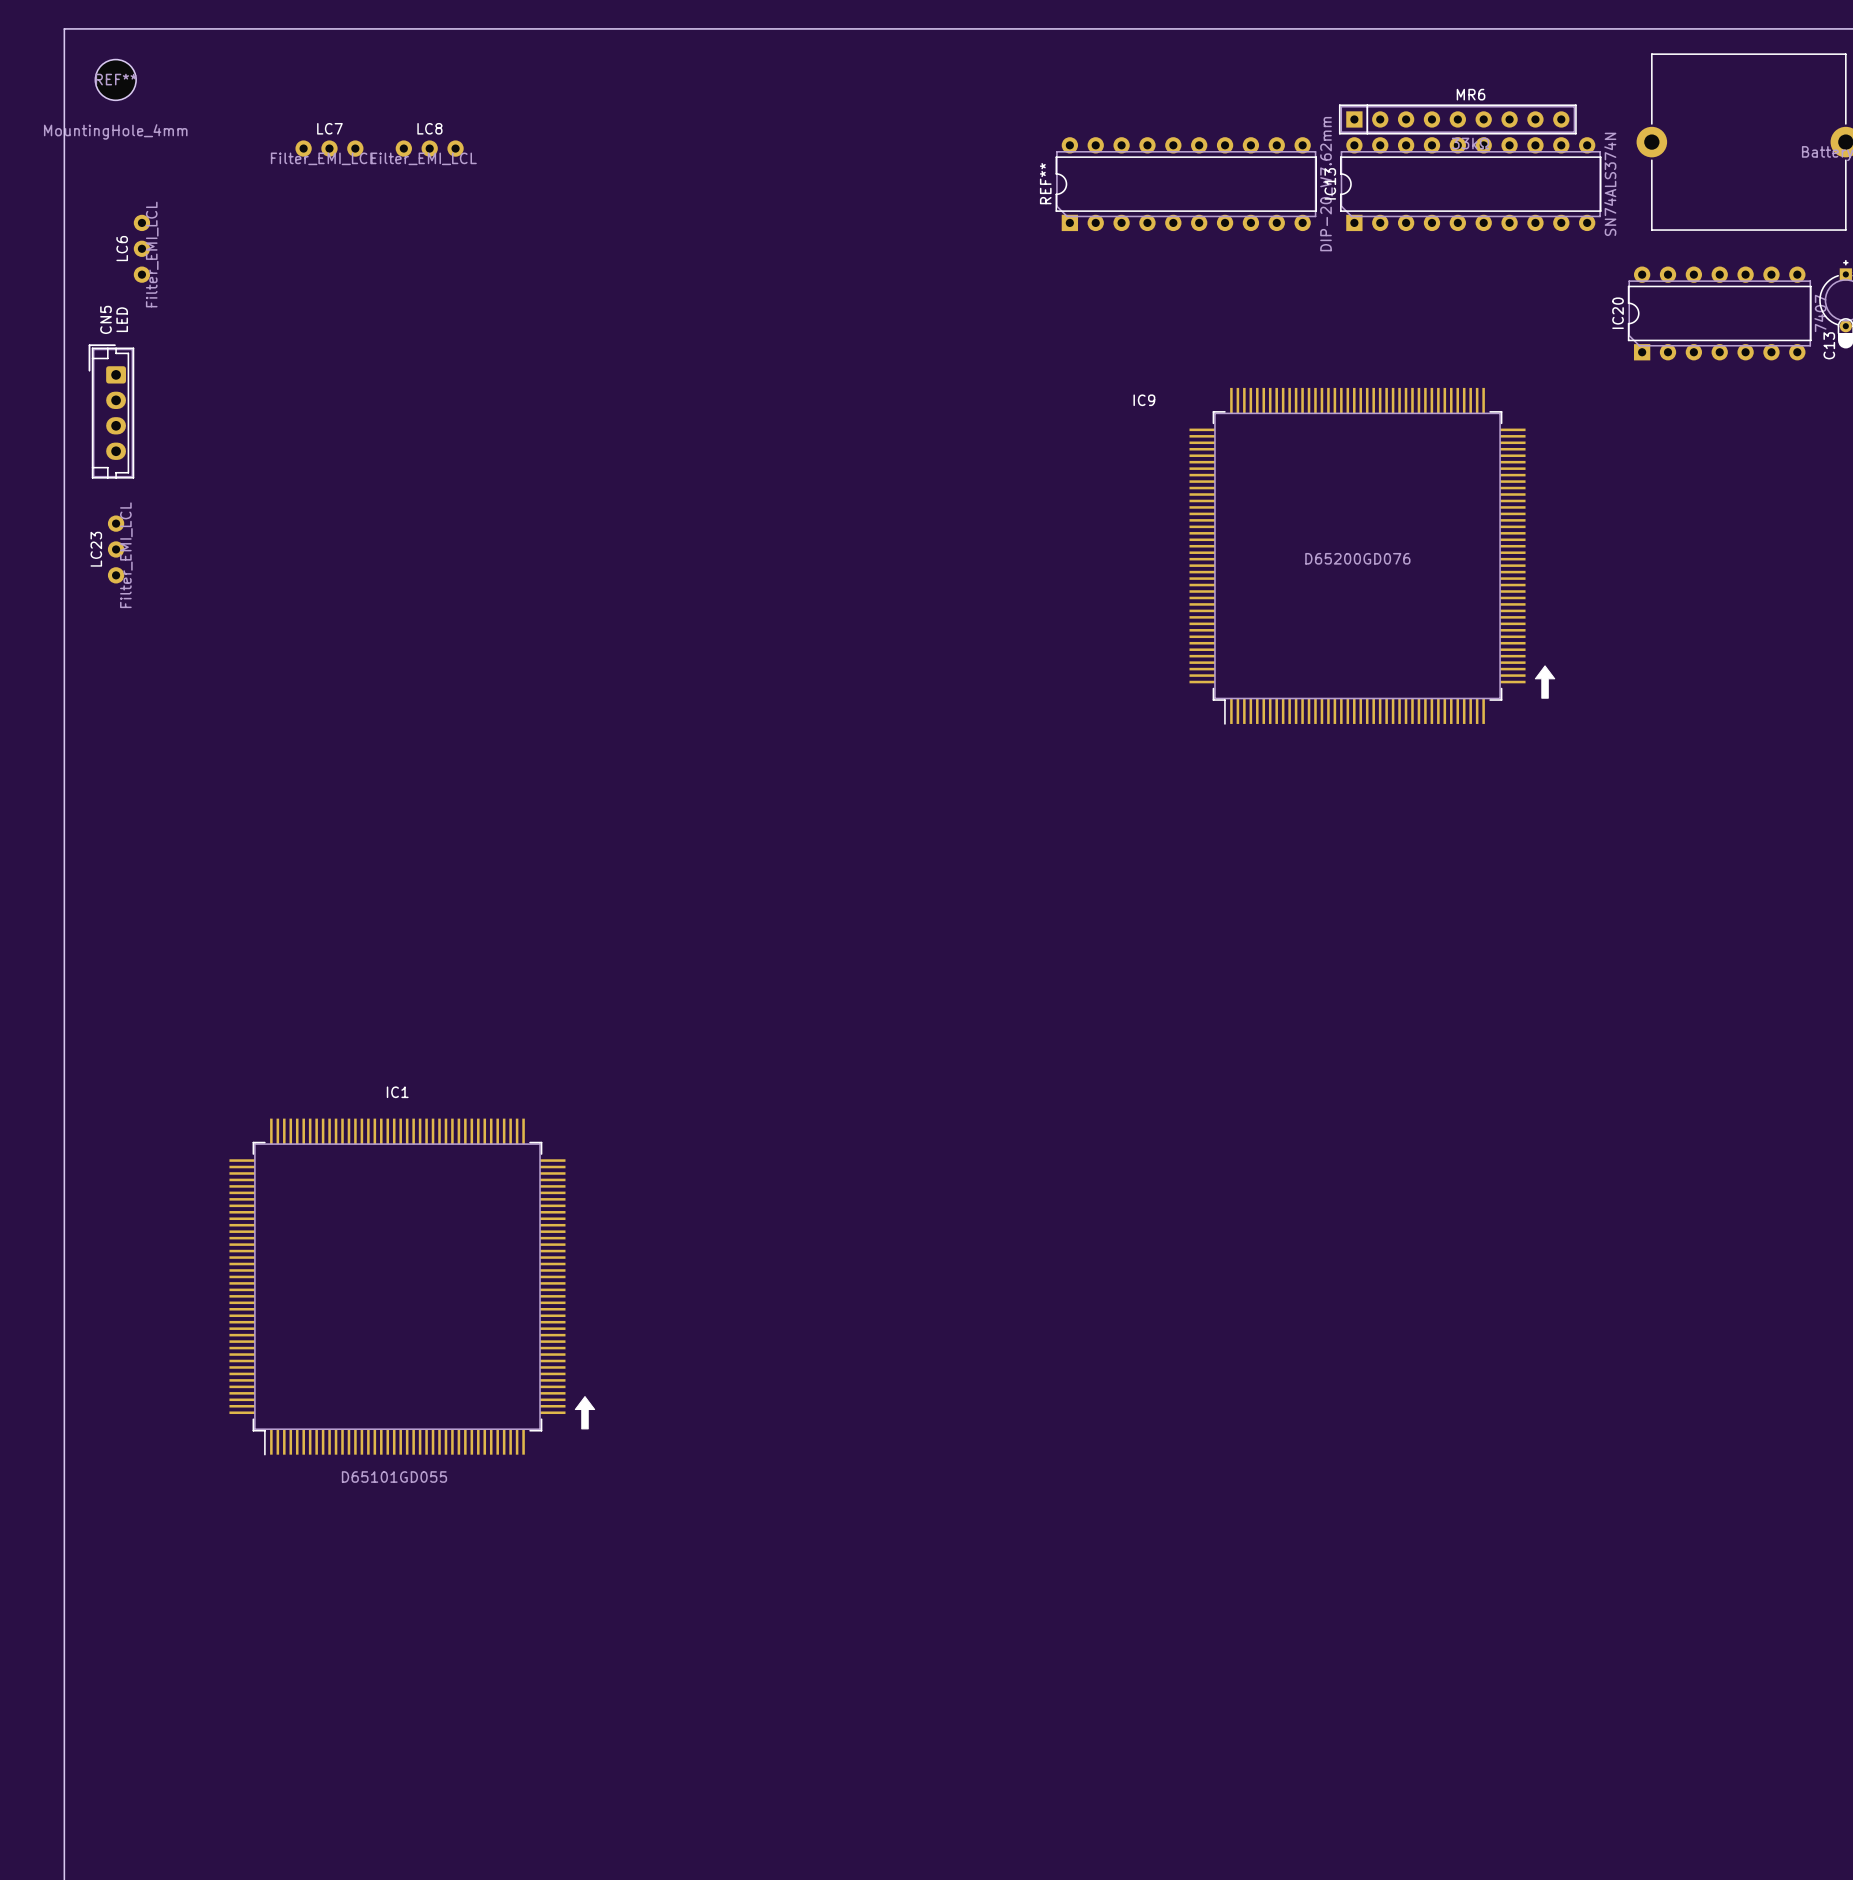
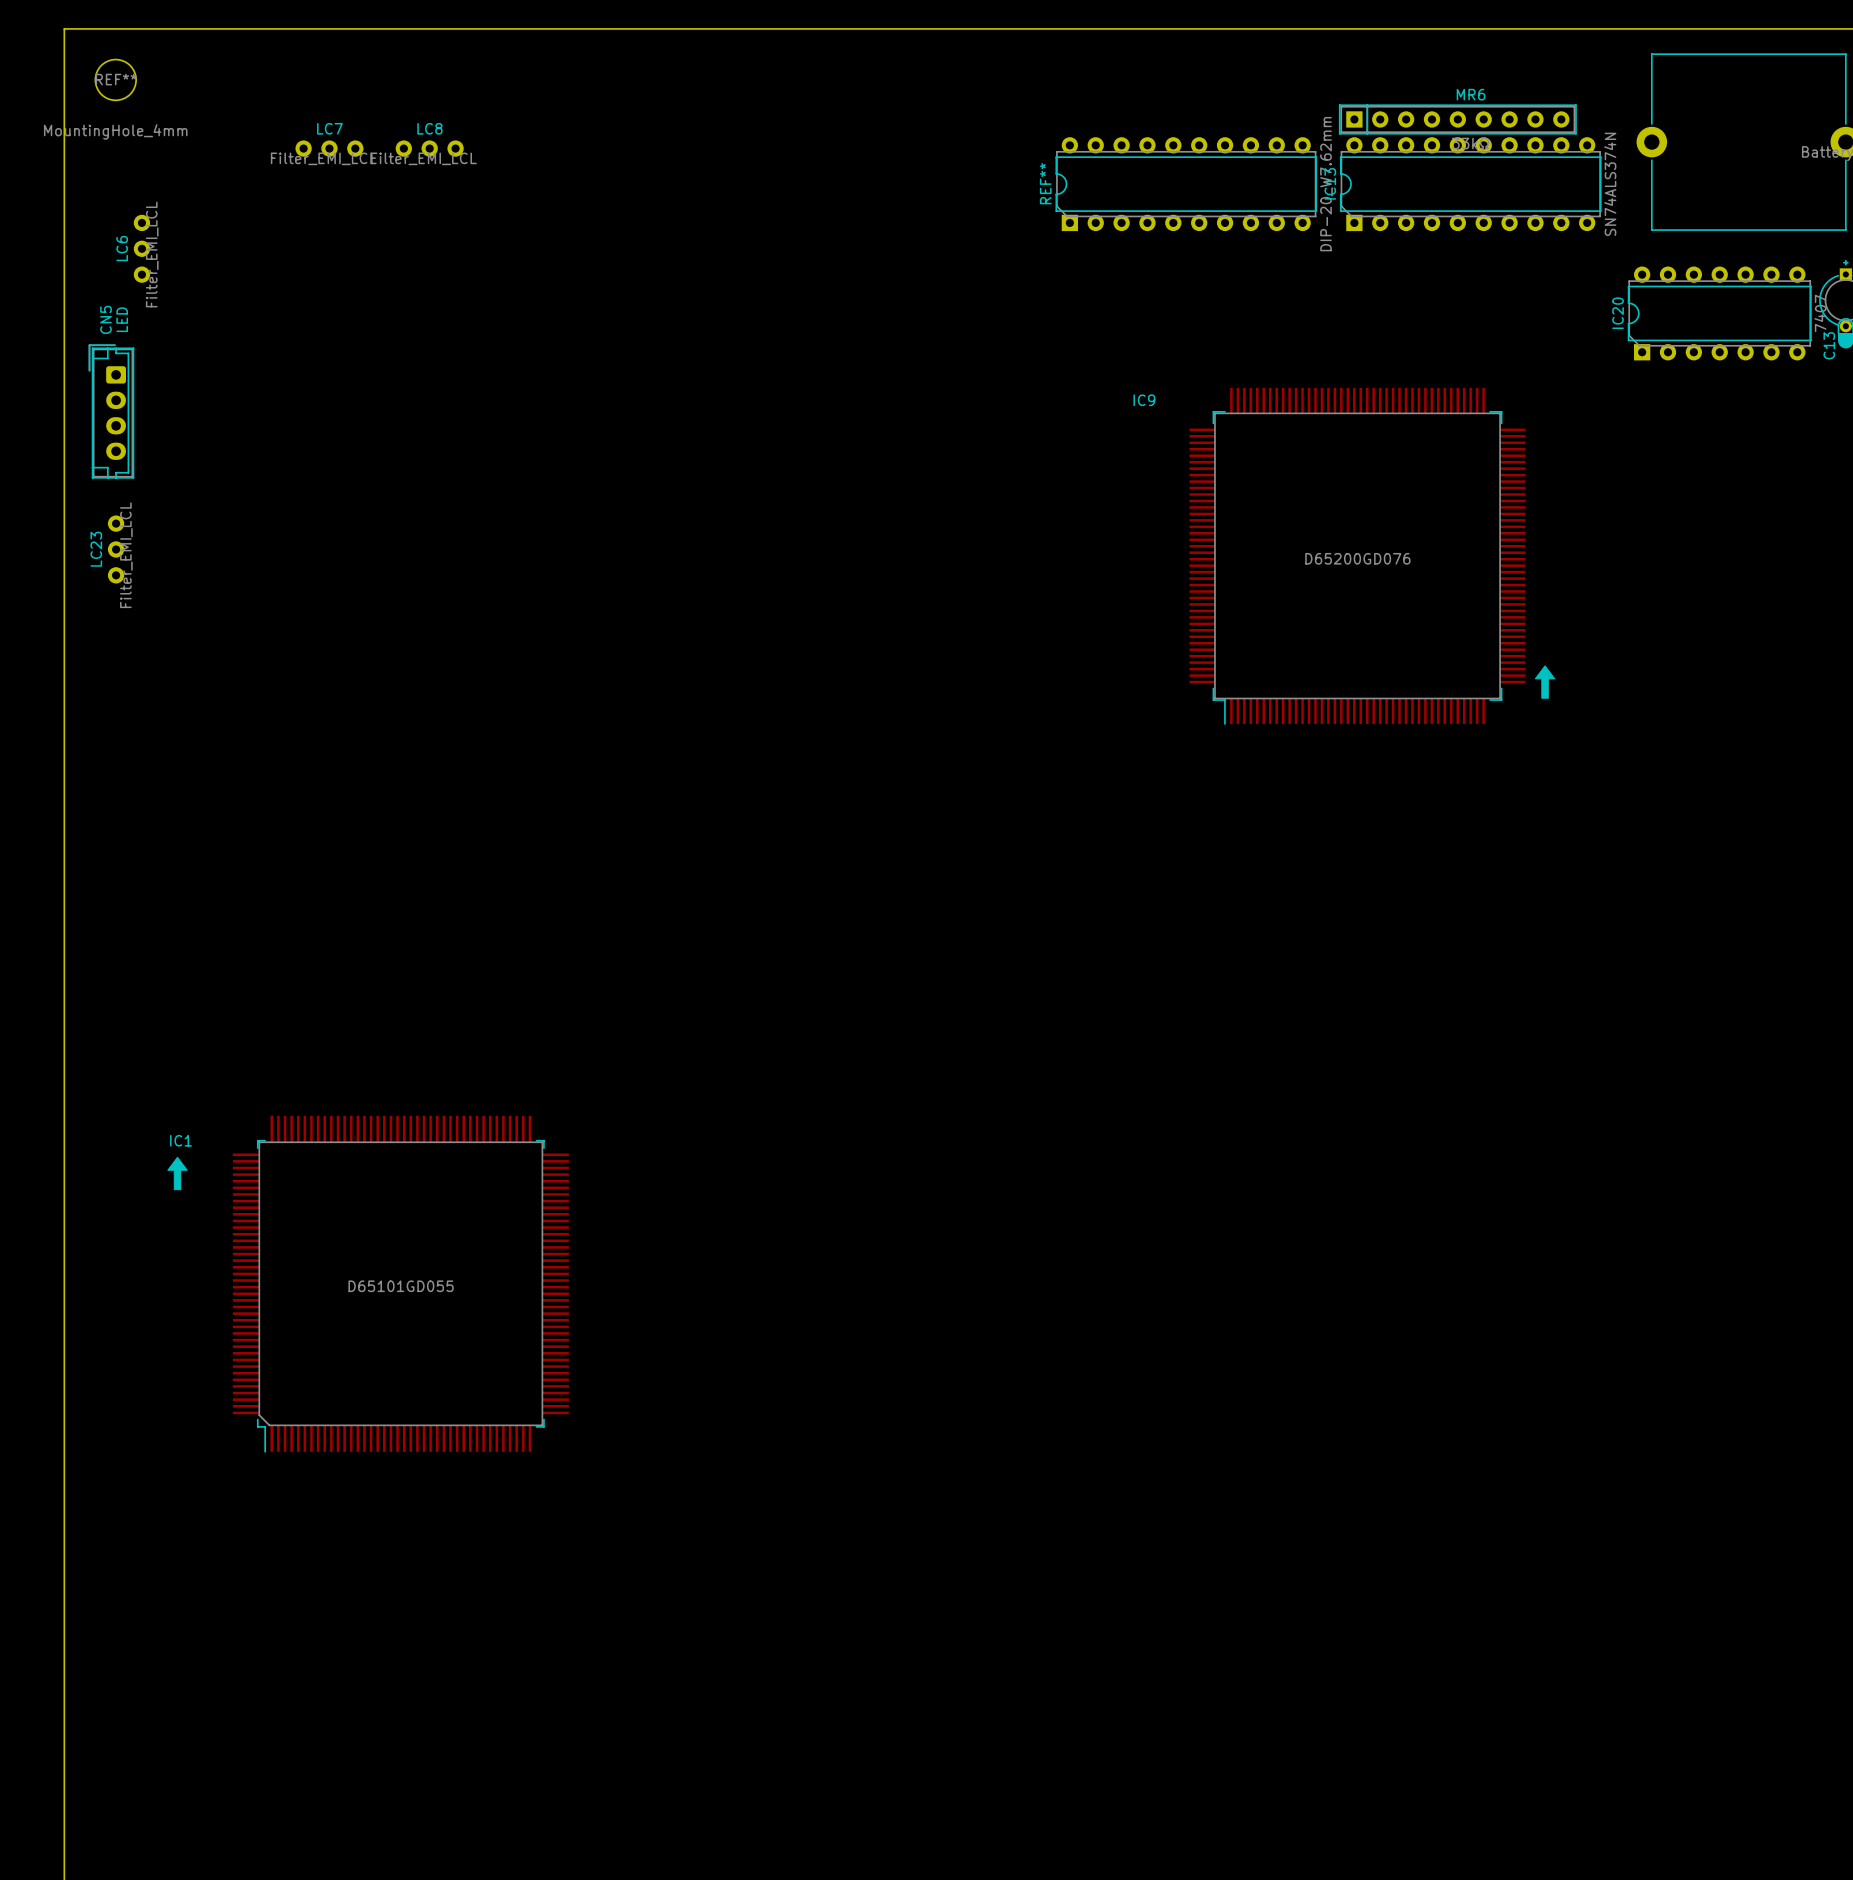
IC1 name position: IC1 (397, 1092) -> IC1 (180, 1140)
IC1 footprint: [229, 1118, 596, 1456] -> [232, 1115, 569, 1453]
drawing: none -> [167, 1156, 188, 1191]
IC1 value position: D65101GD055 (394, 1477) -> D65101GD055 (401, 1286)

